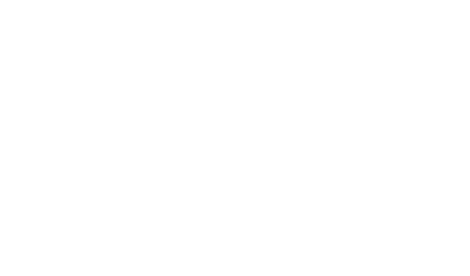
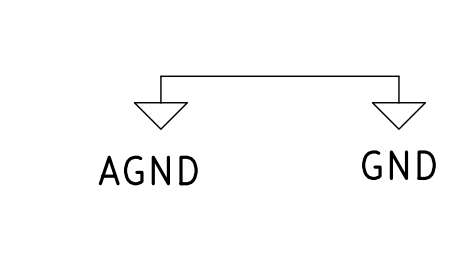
wire: none -> (160, 76) (398, 76)
power symbol: none -> AGND (160, 102)
power symbol: none -> GND (398, 102)

